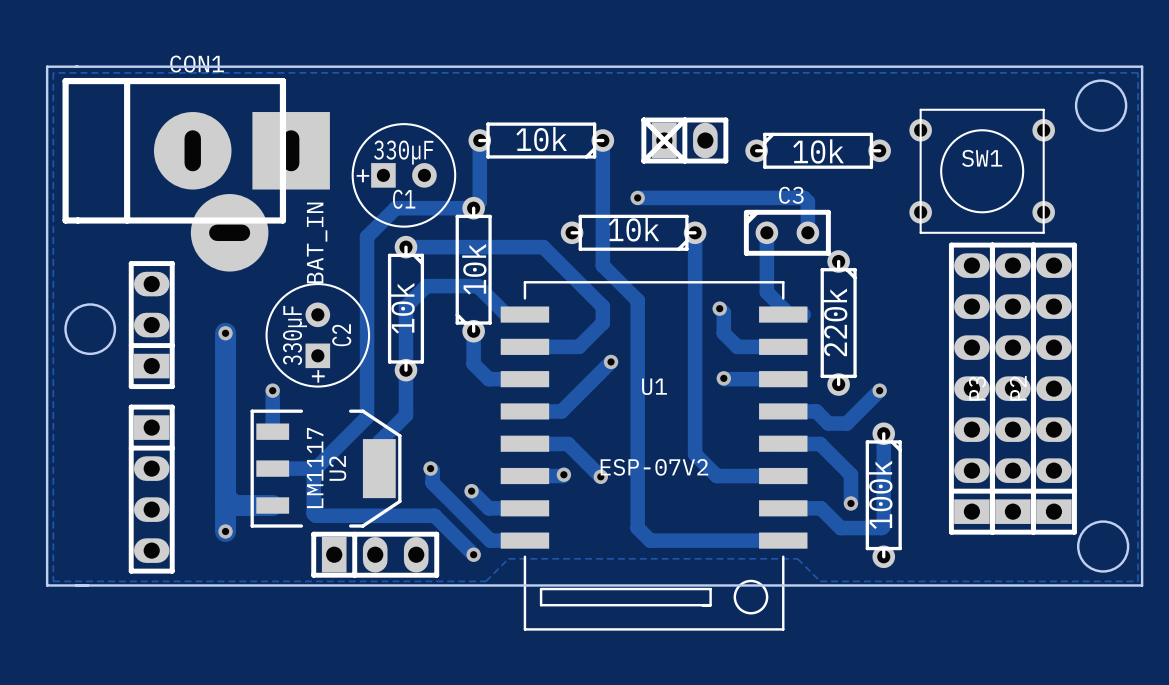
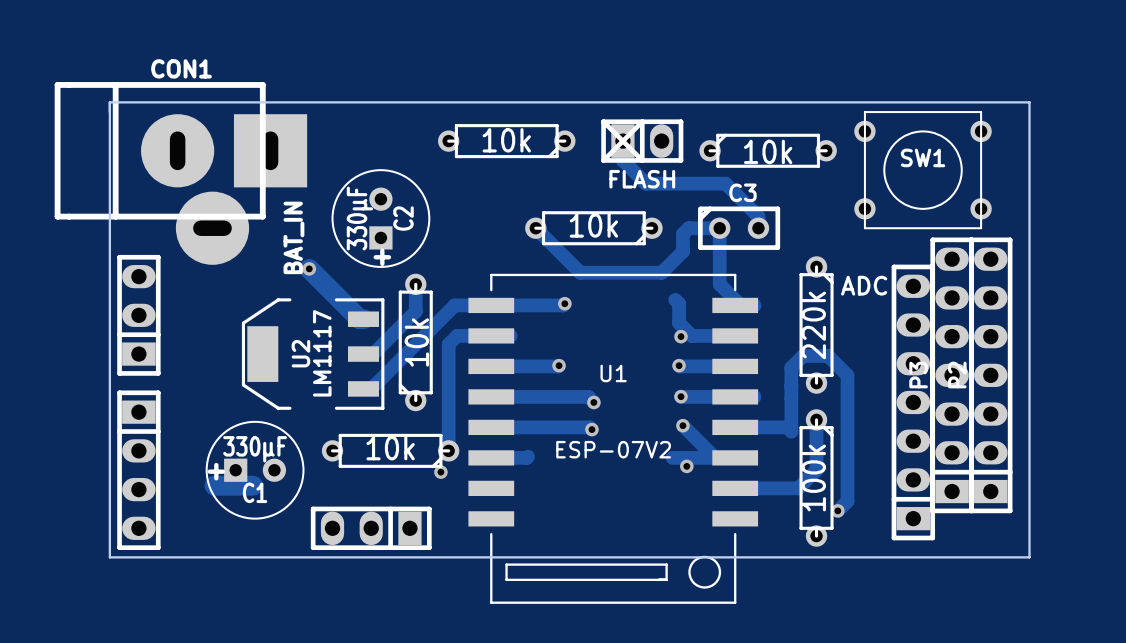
board edge: (47, 66) (47, 585) (1142, 585) (1142, 66) (47, 66) -> (109, 102) (109, 557) (1029, 557) (1029, 102) (109, 102)
zone outline: (53, 72) (53, 581) (485, 581) (508, 558) (797, 558) (820, 581) (1138, 581) (1138, 72) (53, 72) -> none
round board edge: [1074, 79, 1128, 132] -> none
track: (479, 140) (479, 202) (473, 208) (395, 208) (367, 236) (367, 417) (315, 468) (272, 468) -> none
track: (602, 140) (602, 265) (637, 300) (637, 528) (650, 540) (783, 540) -> none
C1 position: (403, 175) -> (255, 470)
FLASH name: none -> FLASH (642, 179)
track: (637, 197) (803, 197) (807, 202) (807, 220) -> (622, 141) (622, 160) (646, 183) (725, 183) (758, 216)
via: (637, 197) -> none
track: none -> (535, 228) (580, 272) (661, 272) (682, 251) (682, 234) (688, 228) (719, 228)
track: (695, 232) (695, 454) (716, 476) -> none
track: (405, 247) (543, 247) (602, 306) (602, 323) (578, 346) (545, 346) -> none
part: 10k (473, 269) -> none
track: none -> (309, 268) (359, 319) (363, 319)
via: none -> (309, 268)
track: none -> (415, 284) (415, 311) (373, 354) (363, 354)
round board edge: [64, 303, 117, 356] -> none
part: 10k (405, 308) -> none
via position: (719, 308) -> (681, 336)
track: none -> (564, 303) (563, 305) (491, 305)
via: none -> (564, 303)
track: (506, 314) (477, 286) (426, 286) (405, 306) (405, 415) (379, 441) (379, 468) -> (473, 305) (454, 305) (371, 388) (363, 388)
part position: (838, 323) -> (816, 325)
track: (473, 331) (473, 364) (488, 379) (524, 379) -> (559, 365) (491, 366)
track: (225, 333) (225, 531) -> none
via: (225, 333) -> none
C2 position: (317, 335) -> (380, 218)
track: none -> (491, 335) (457, 335) (448, 344) (448, 450)
part: none -> 10k (415, 342)
track: (611, 361) (561, 411) -> (593, 402) (588, 396) (525, 396)
via position: (611, 361) -> (559, 365)
part: (971, 388) -> none
track: (272, 390) (272, 431) -> none
via: (272, 390) -> none
track: (879, 390) (846, 423) (828, 423) (816, 411) (803, 411) -> none
via: (879, 390) -> none
track: none -> (681, 396) (735, 396)
via: none -> (681, 396)
via: none -> (593, 402)
ADC: none -> (913, 402)
track: (883, 433) (883, 526) (881, 528) (840, 528) (820, 508) -> (816, 419) (816, 470) (798, 488) (770, 488)
track: none -> (682, 425) (715, 457)
via: none -> (682, 425)
track: (524, 443) (567, 443) (600, 476) -> none
track: none -> (510, 427) (589, 427) (591, 429)
track: (783, 443) (820, 443) (850, 474) (850, 503) -> none
track: none -> (754, 427) (787, 427) (791, 431) (791, 367) (802, 356) (828, 356) (847, 375) (847, 501) (837, 510)
via: none -> (591, 429)
track: (313, 468) (313, 513) (315, 515) (434, 515) (473, 554) -> none
U2 rotation: 0° (326, 468) -> 180° (313, 354)
U2 position: (326, 468) -> (313, 354)
part: none -> 10k (390, 450)
track: (430, 468) (432, 470) (432, 482) (490, 540) (524, 540) -> none
via: (430, 468) -> none
via: (563, 474) -> none
via: (600, 476) -> none
via: none -> (686, 466)
track: (471, 491) (488, 508) (524, 508) -> none
part position: (883, 495) -> (816, 477)
via: (850, 503) -> none
round board edge: [1077, 520, 1130, 573] -> none
via: (225, 531) -> none
via: none -> (837, 510)
part rotation: 0° (375, 554) -> 180° (371, 528)
via: (473, 554) -> none

